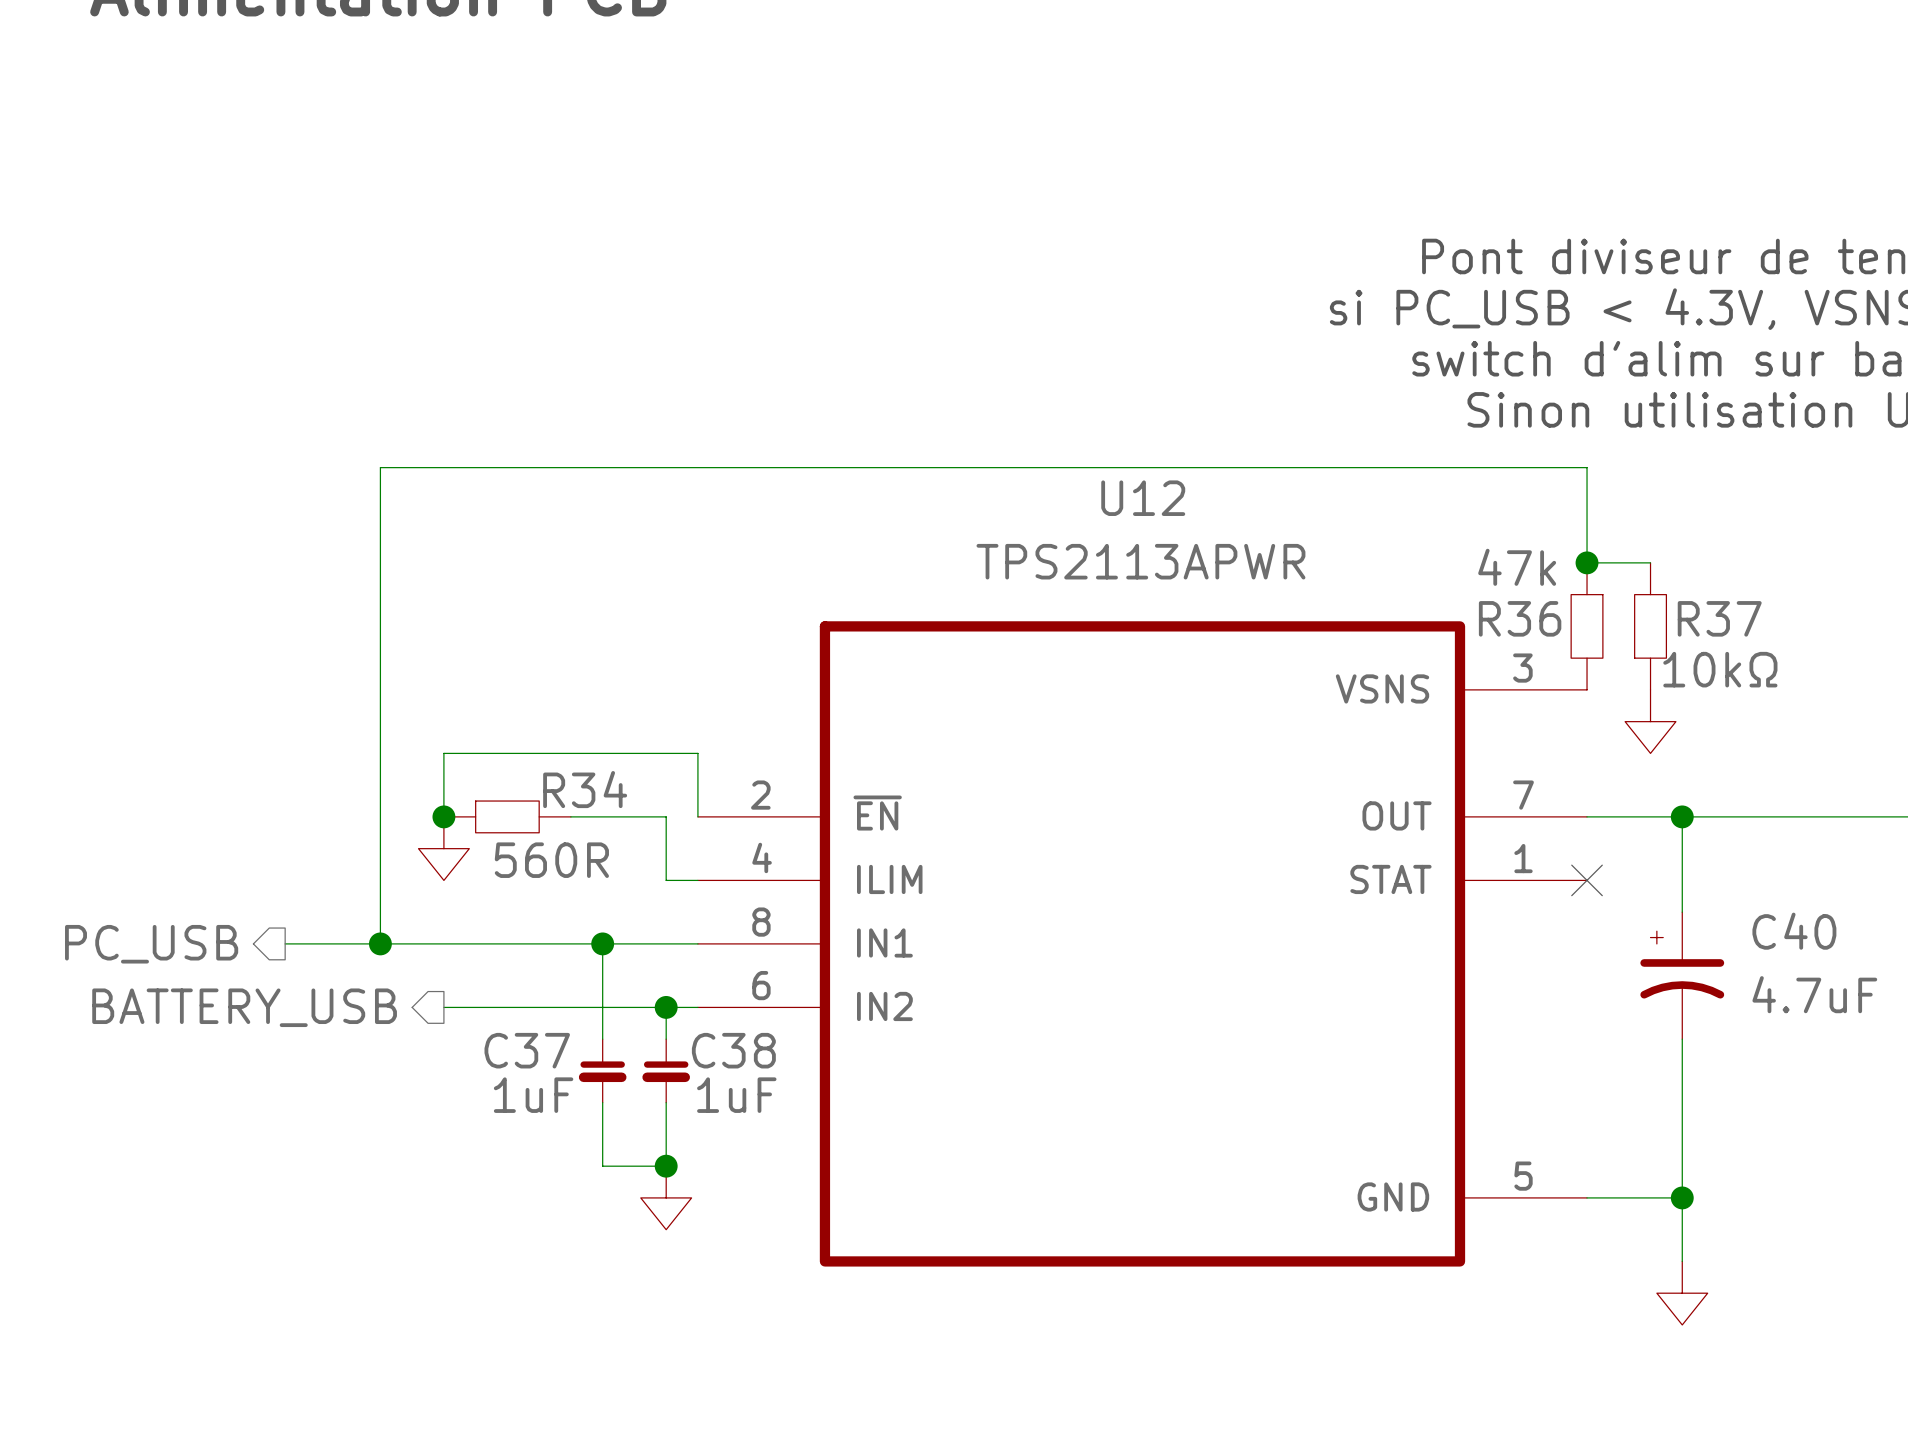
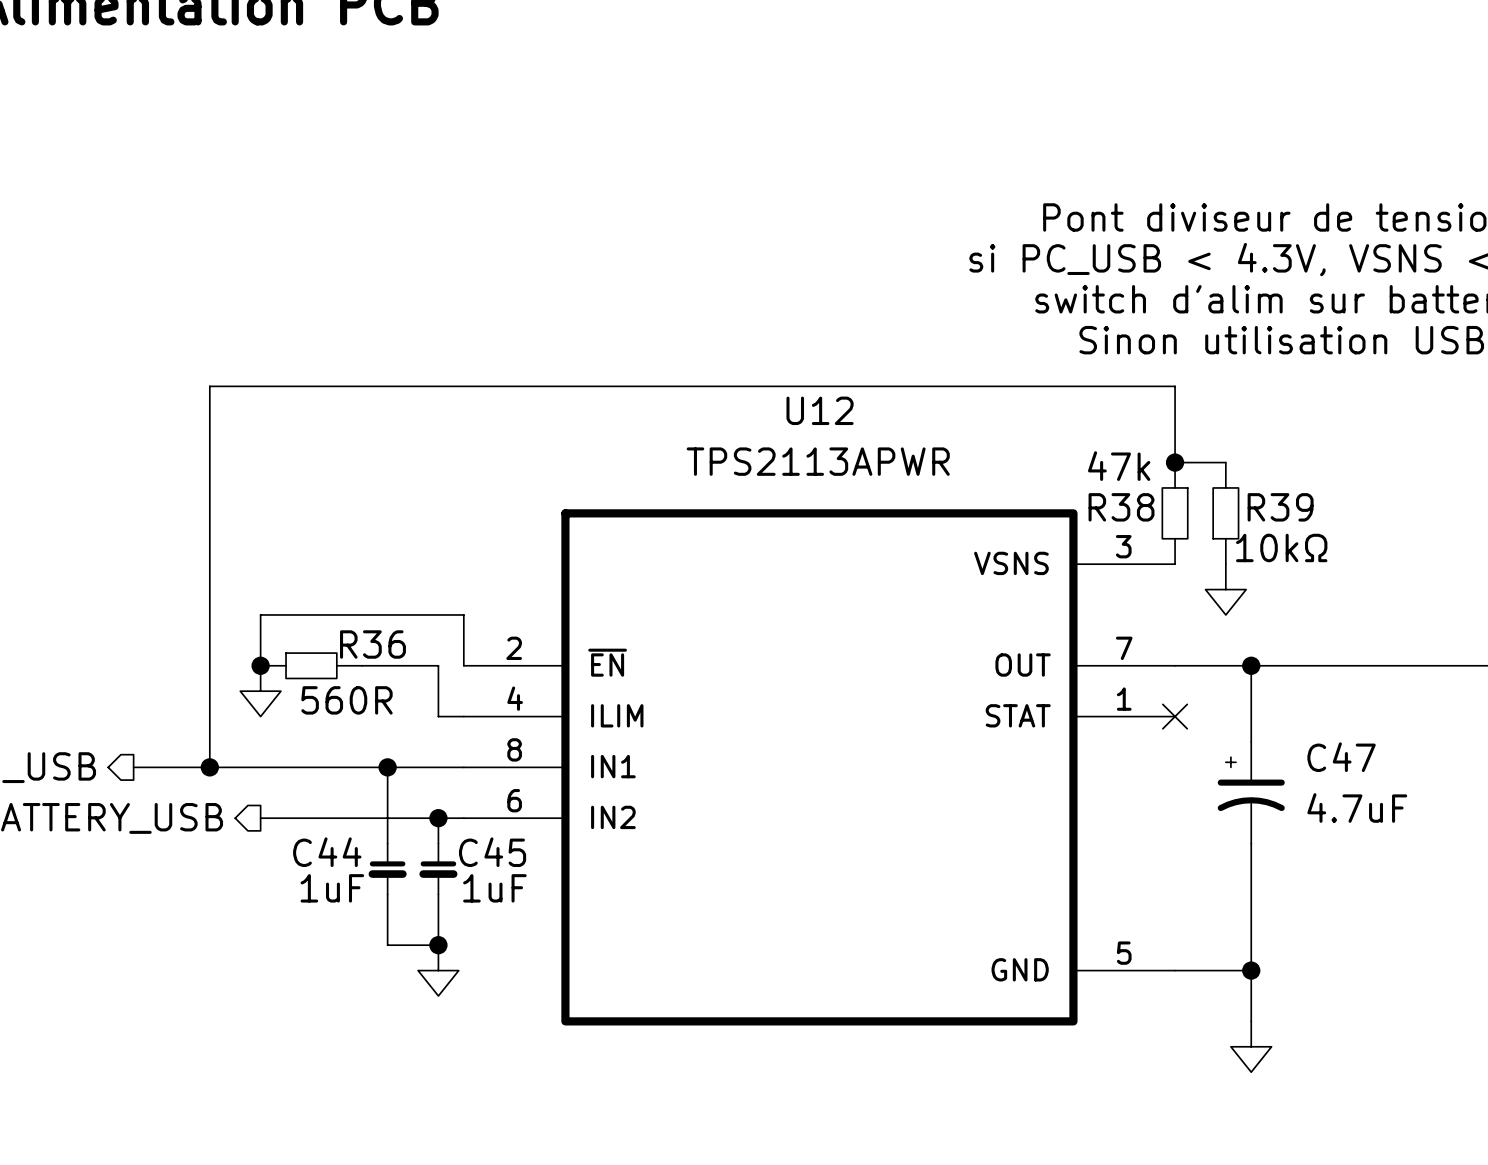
R36 name: R36 (1520, 618) -> R38 (1121, 507)
R37 name: R37 (1719, 618) -> R39 (1280, 507)
R34 name: R34 (585, 789) -> R36 (372, 644)
C40 name: C40 (1794, 931) -> C47 (1341, 757)
C37 name: C37 (527, 1050) -> C44 (327, 852)
C38 name: C38 (733, 1050) -> C45 (492, 852)

